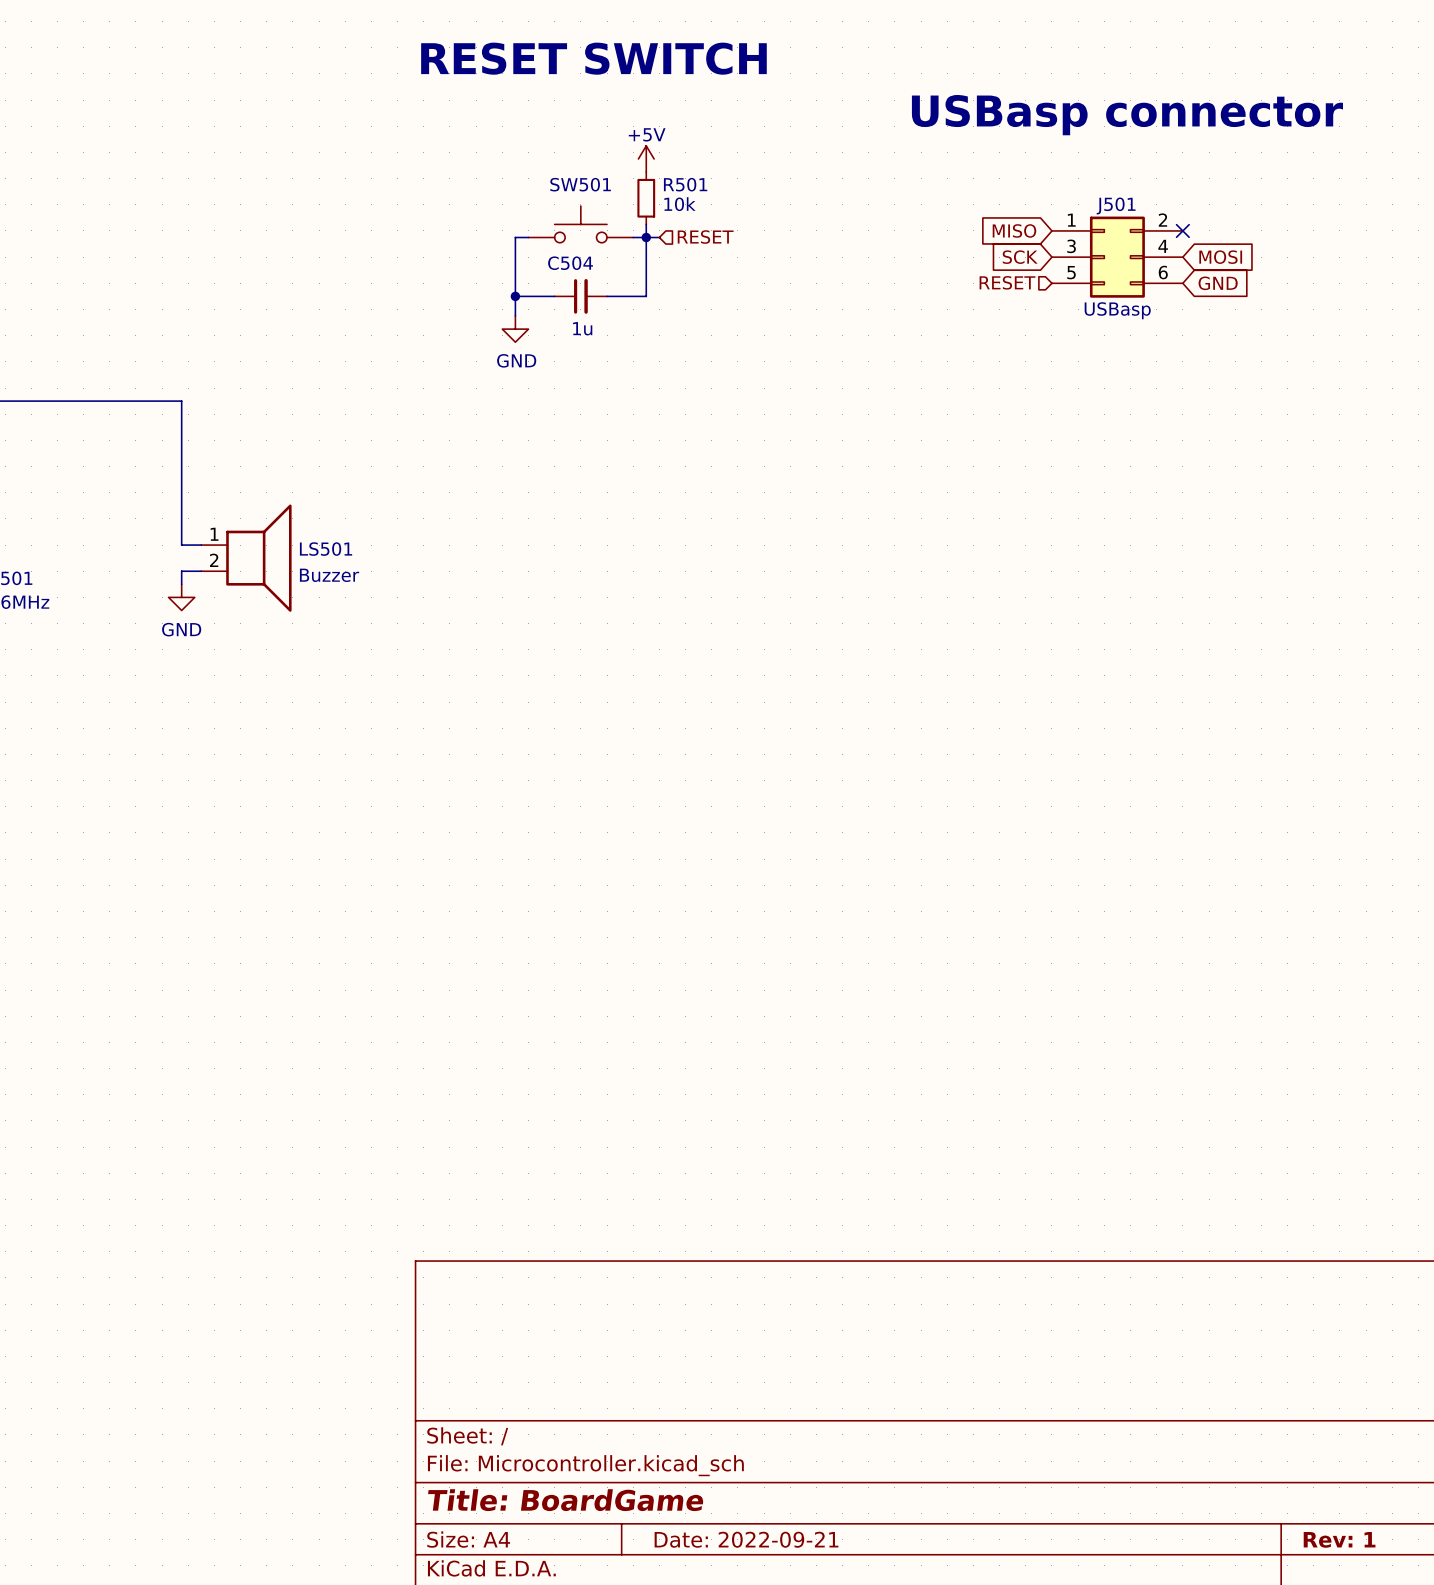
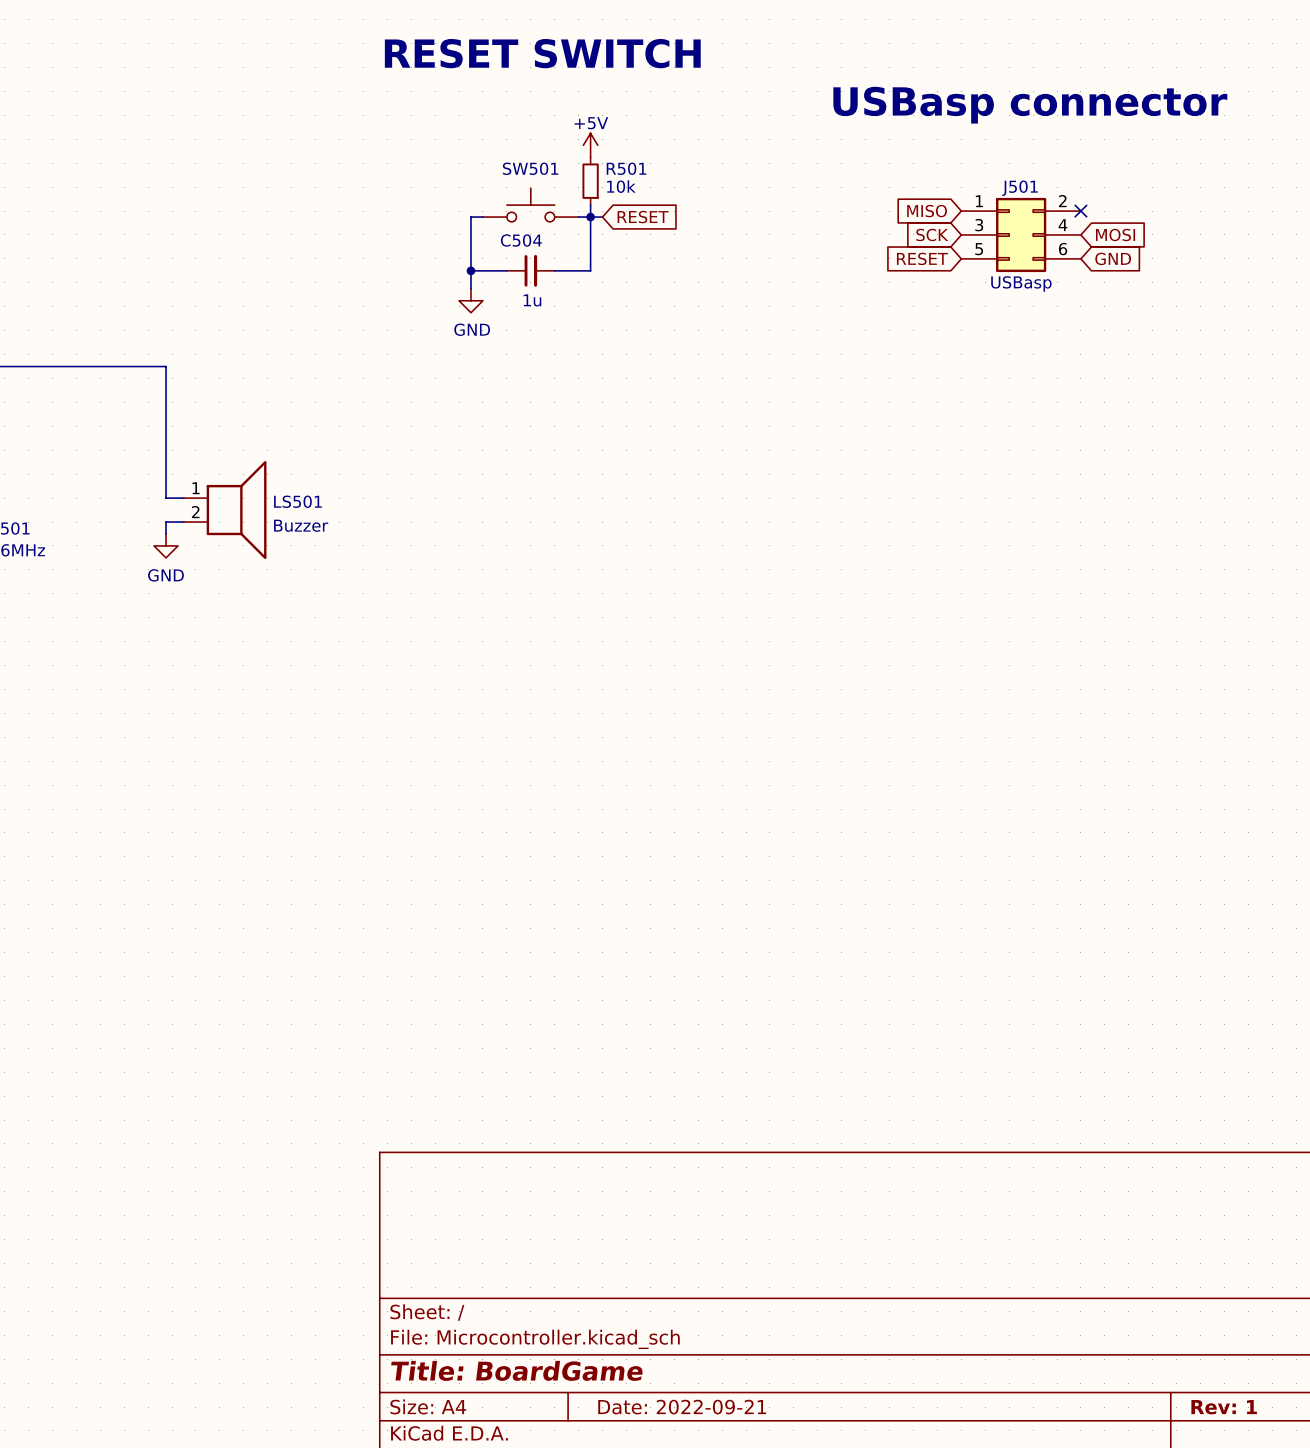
global label: none -> RESET (643, 217)
hierarchical label: RESET (705, 237) -> none
hierarchical label: RESET (1007, 282) -> none
global label: none -> RESET (922, 258)

